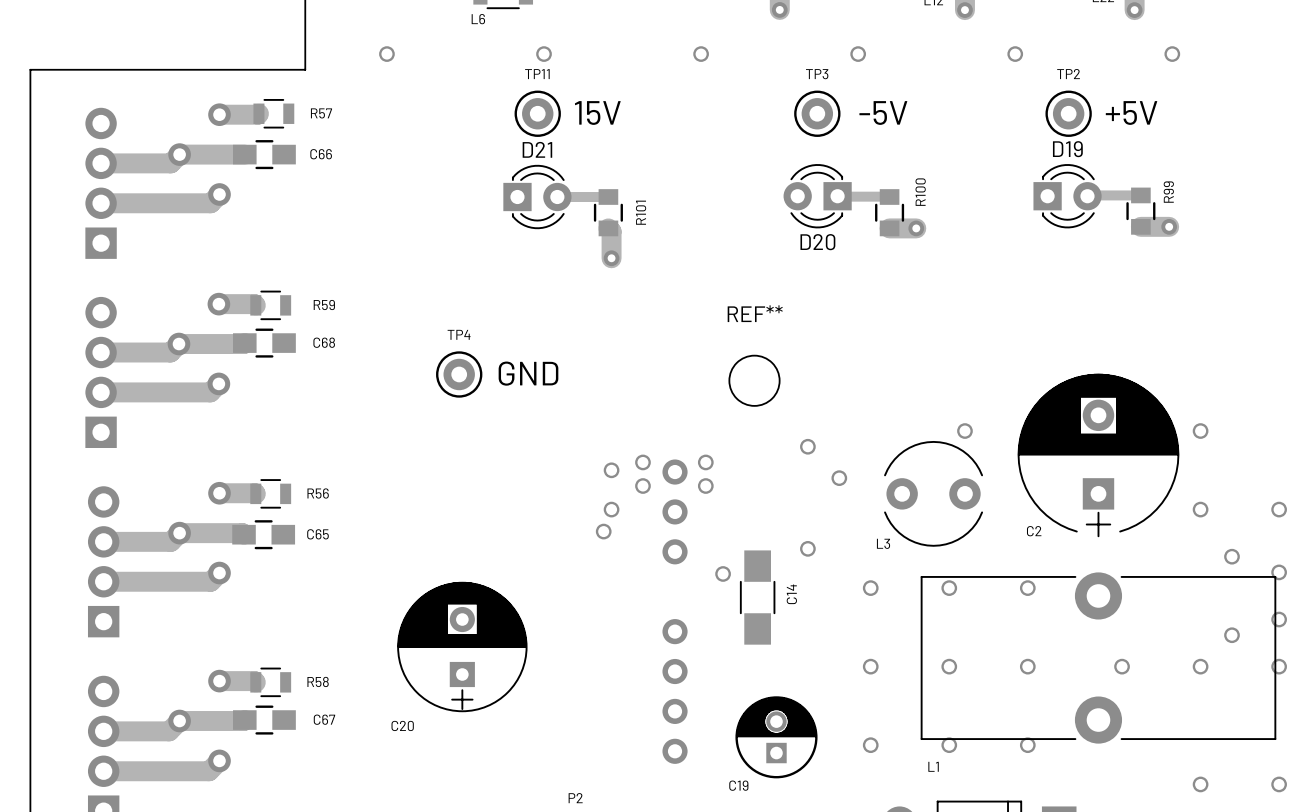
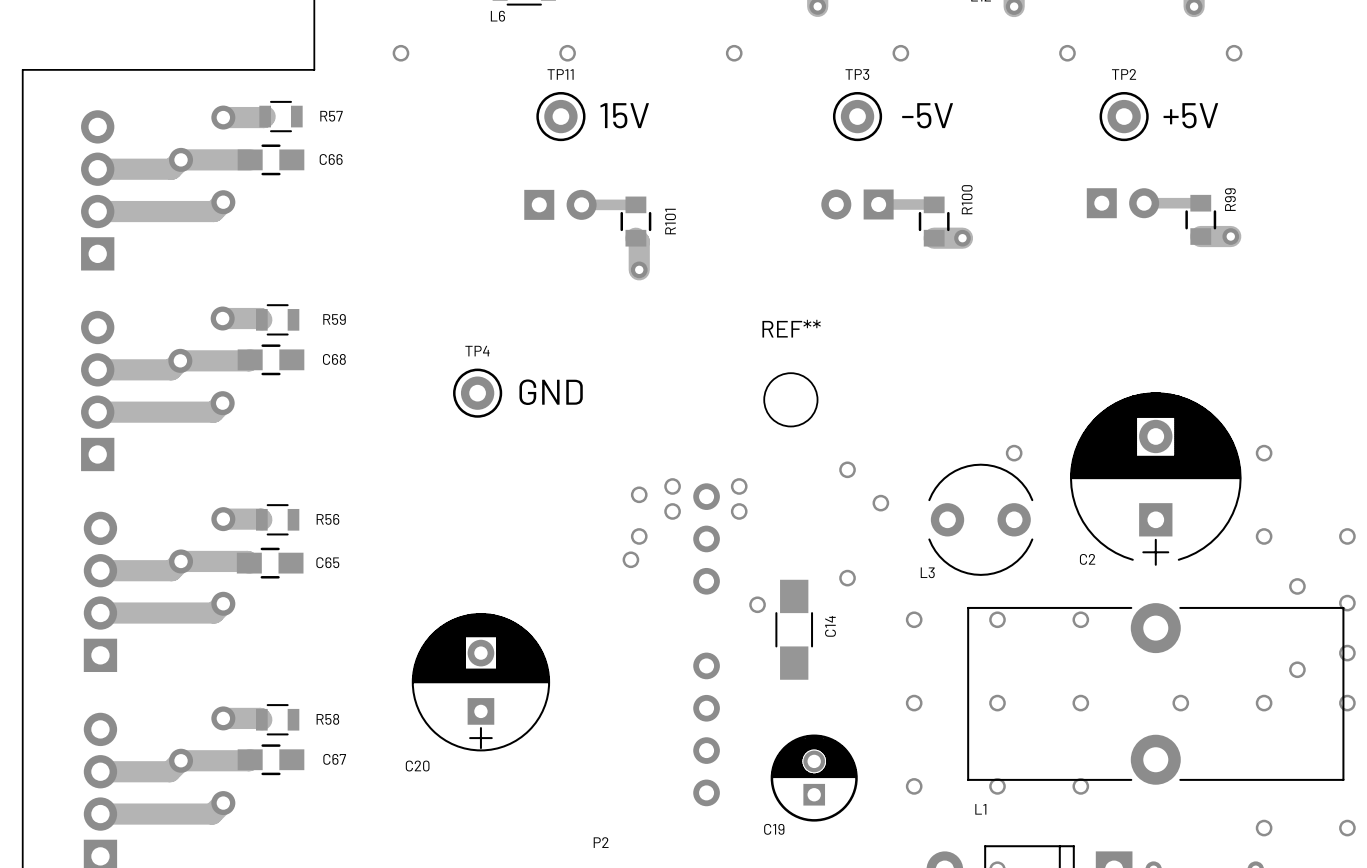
D20 side: top (817, 196) -> bottom (857, 204)
D19 side: top (1067, 196) -> bottom (1122, 203)
D21 side: top (537, 197) -> bottom (560, 204)

